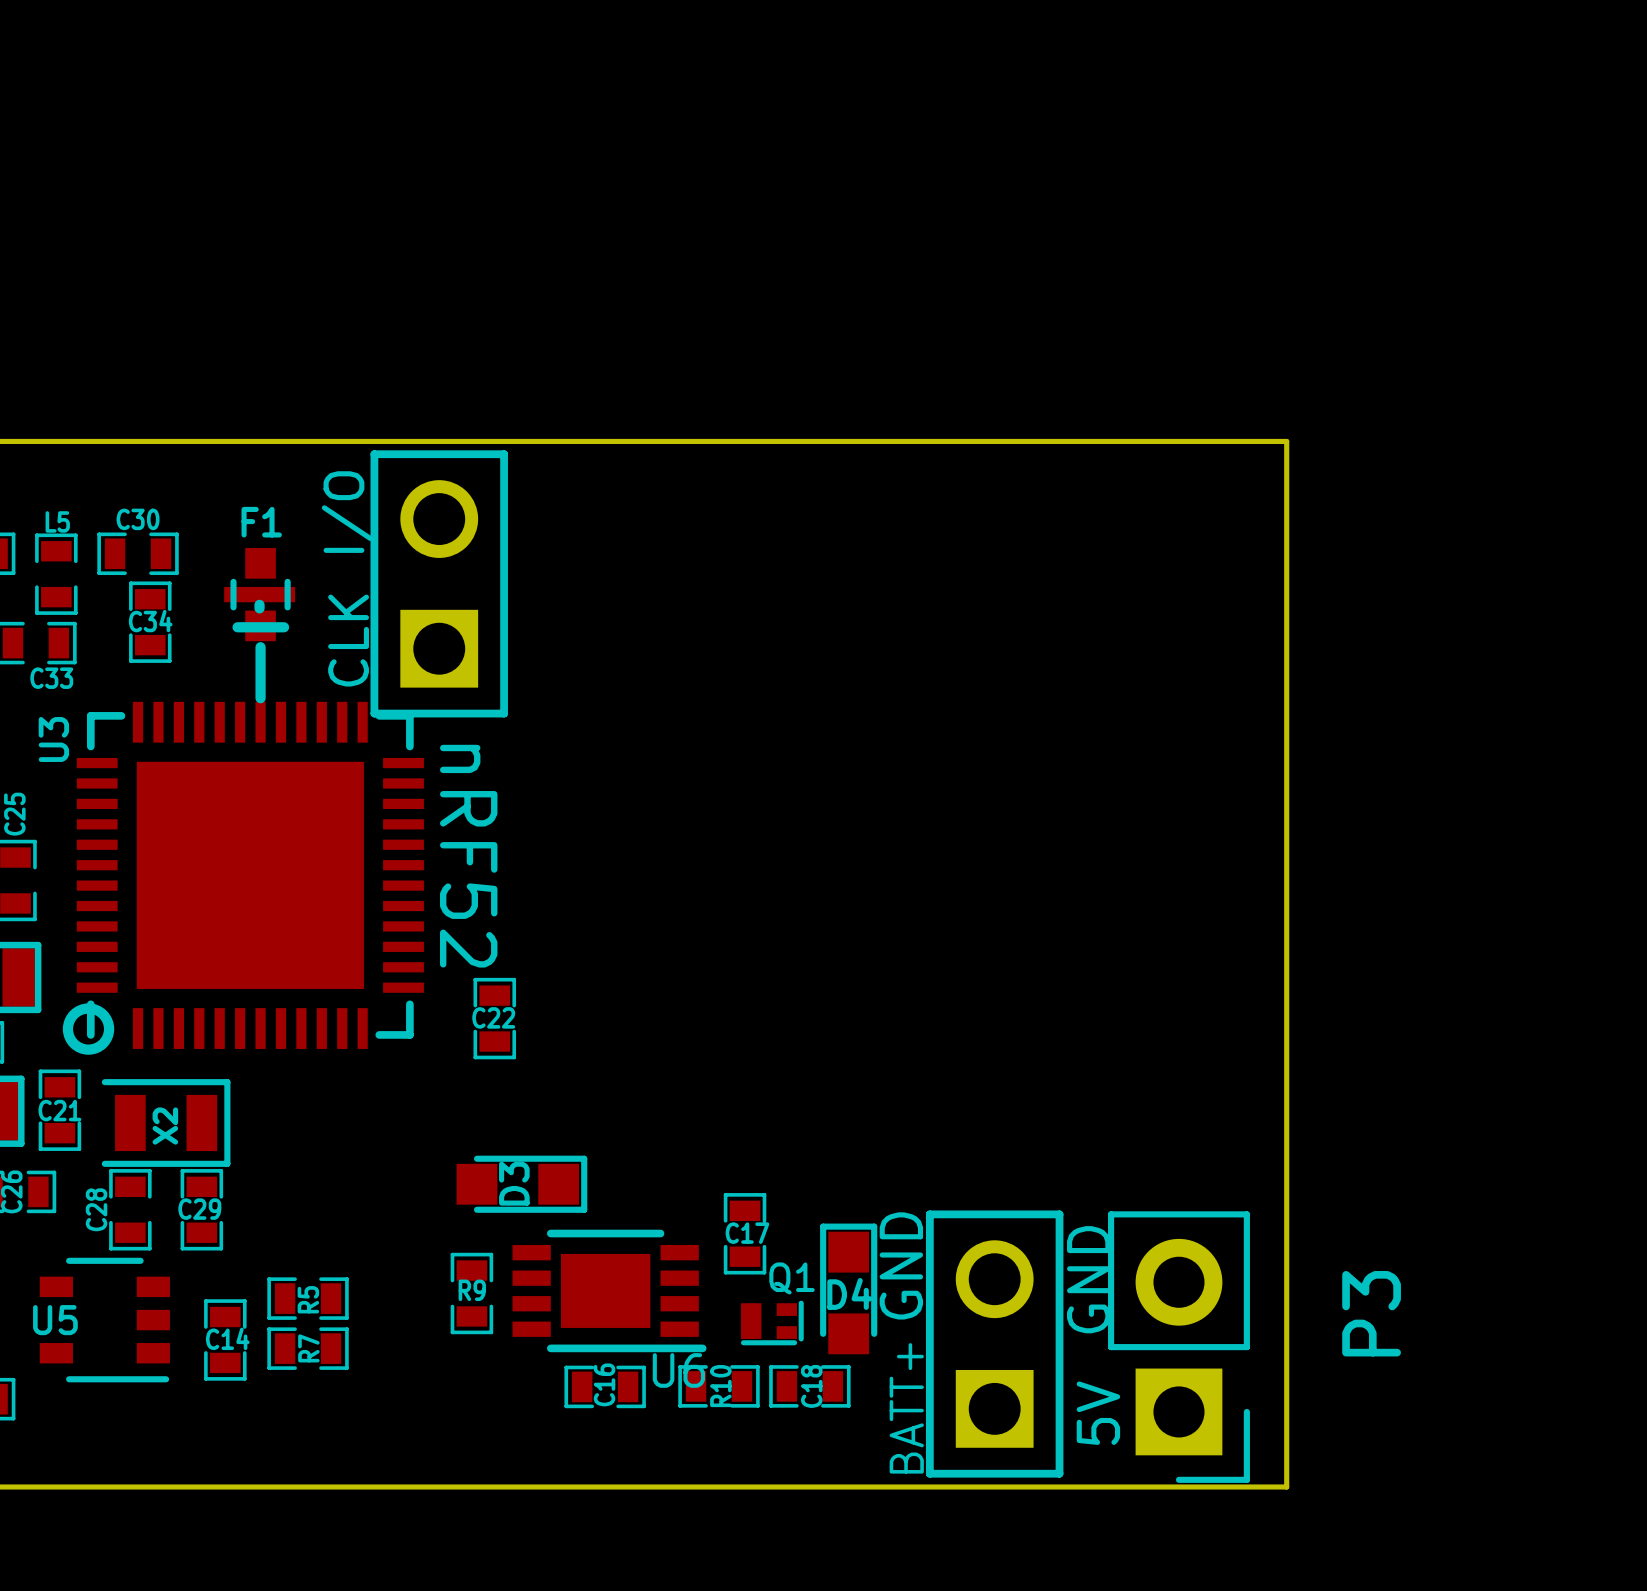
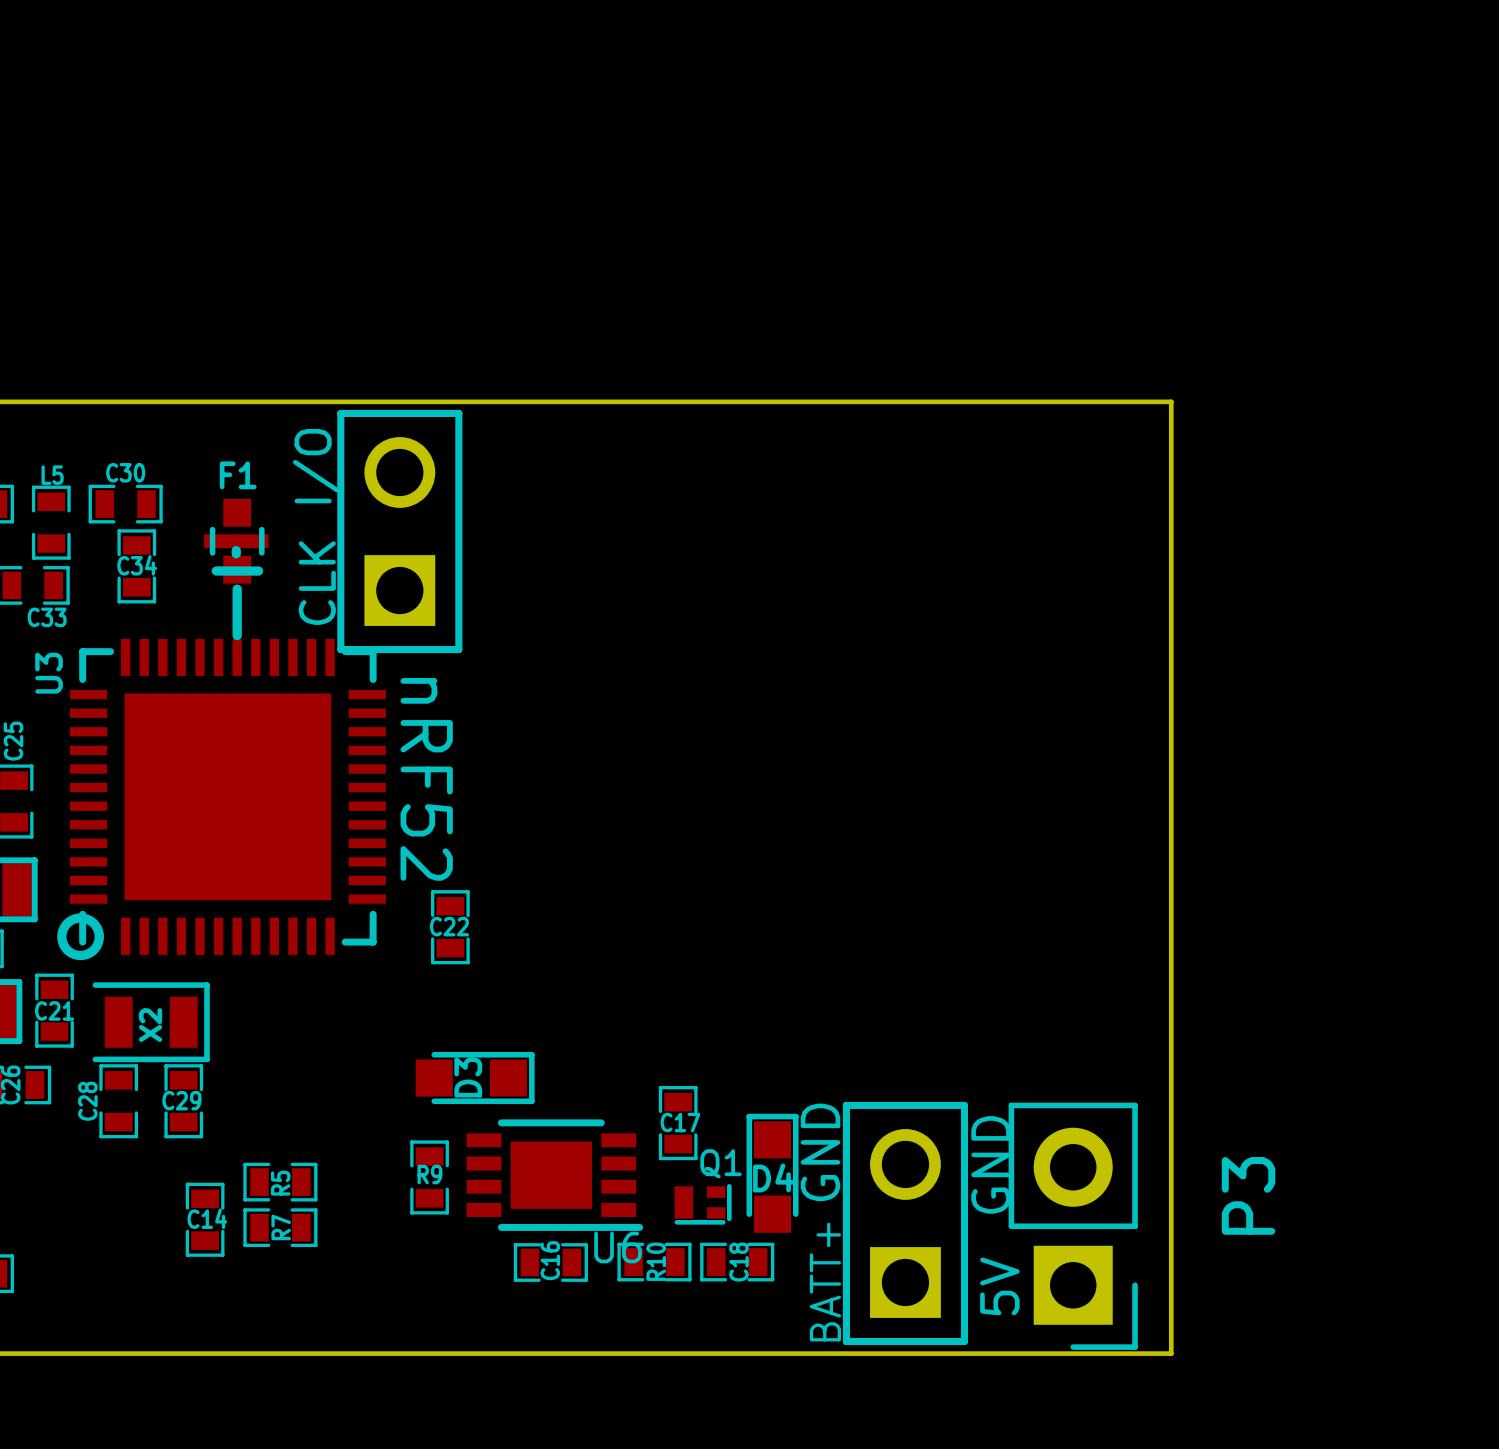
U5: (104, 1320) -> none

